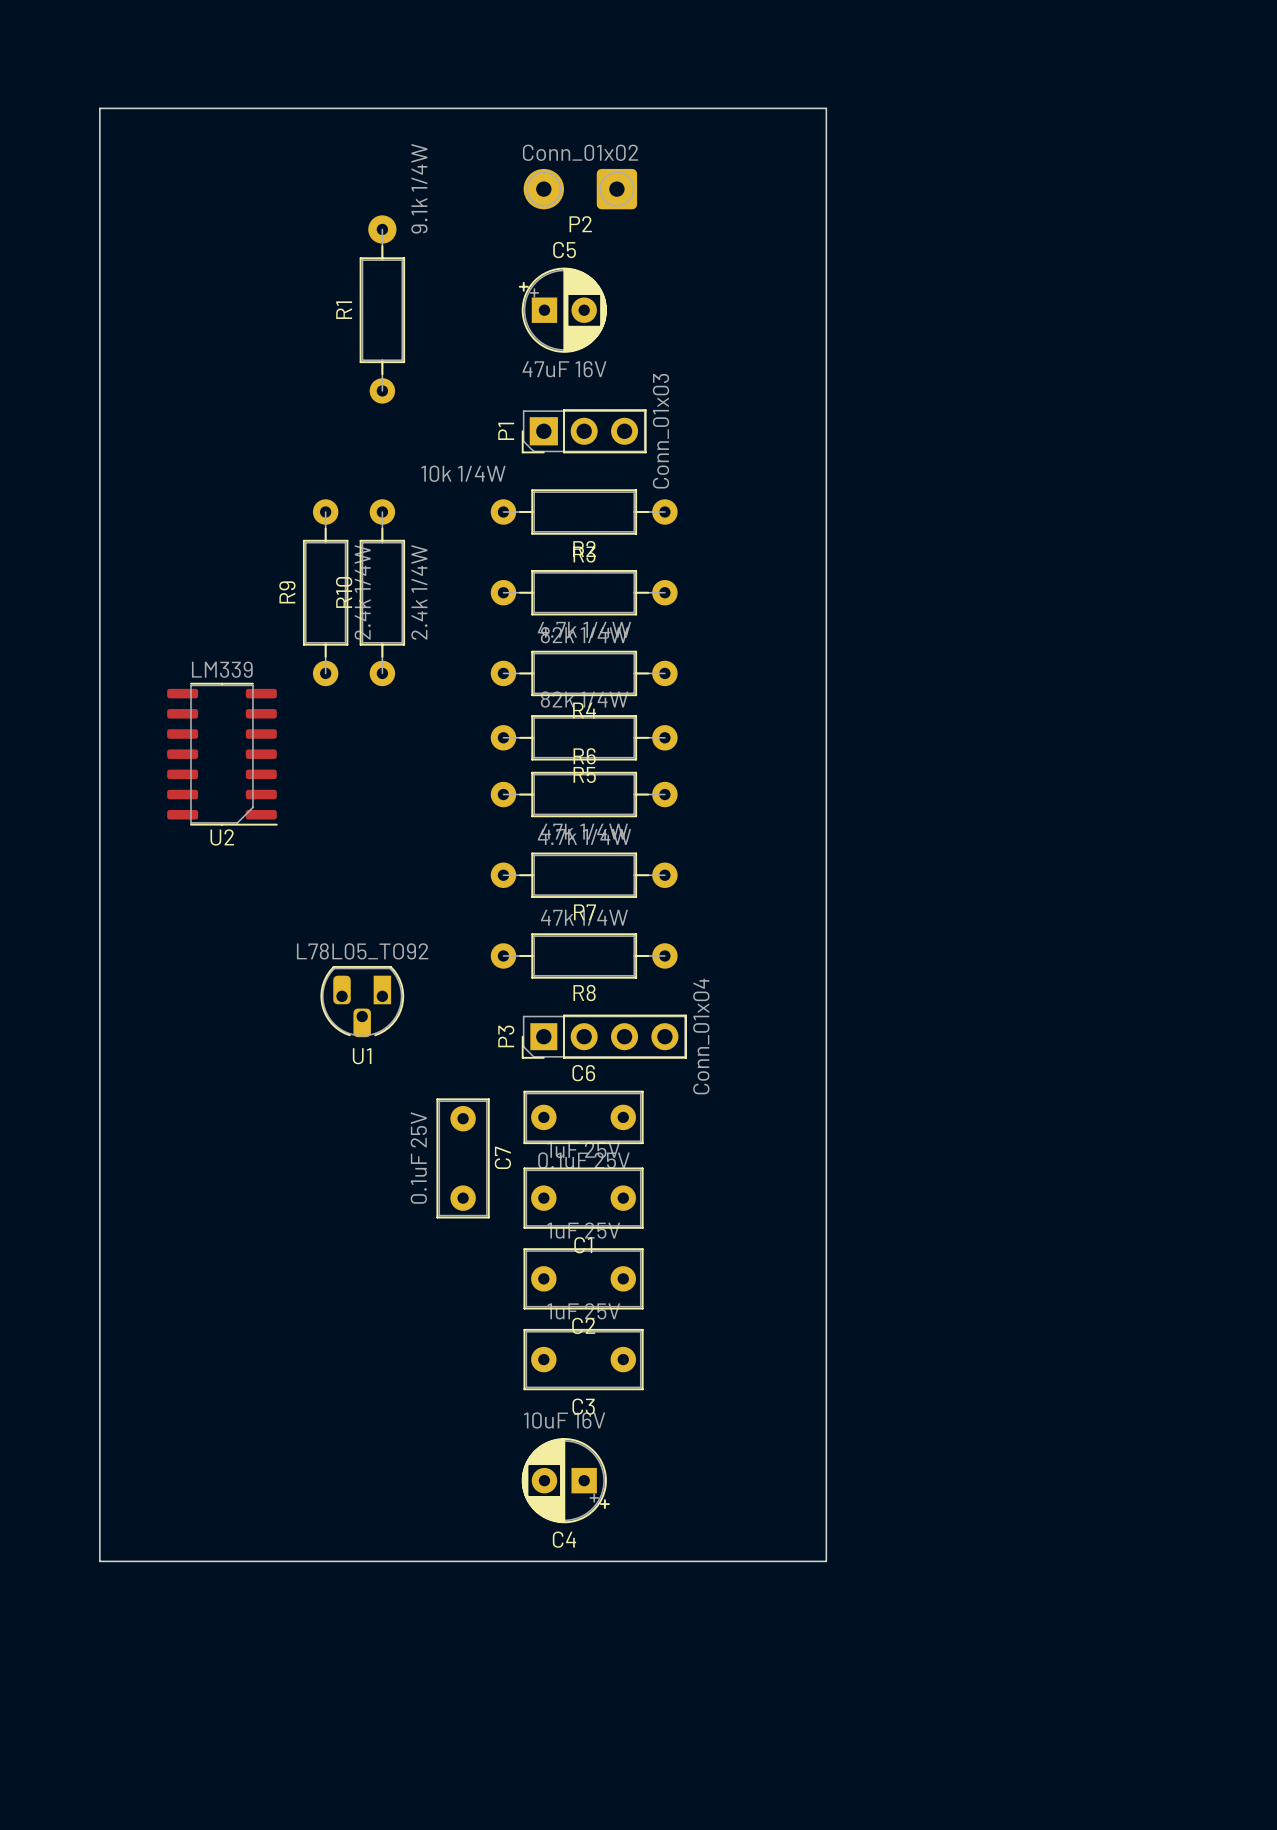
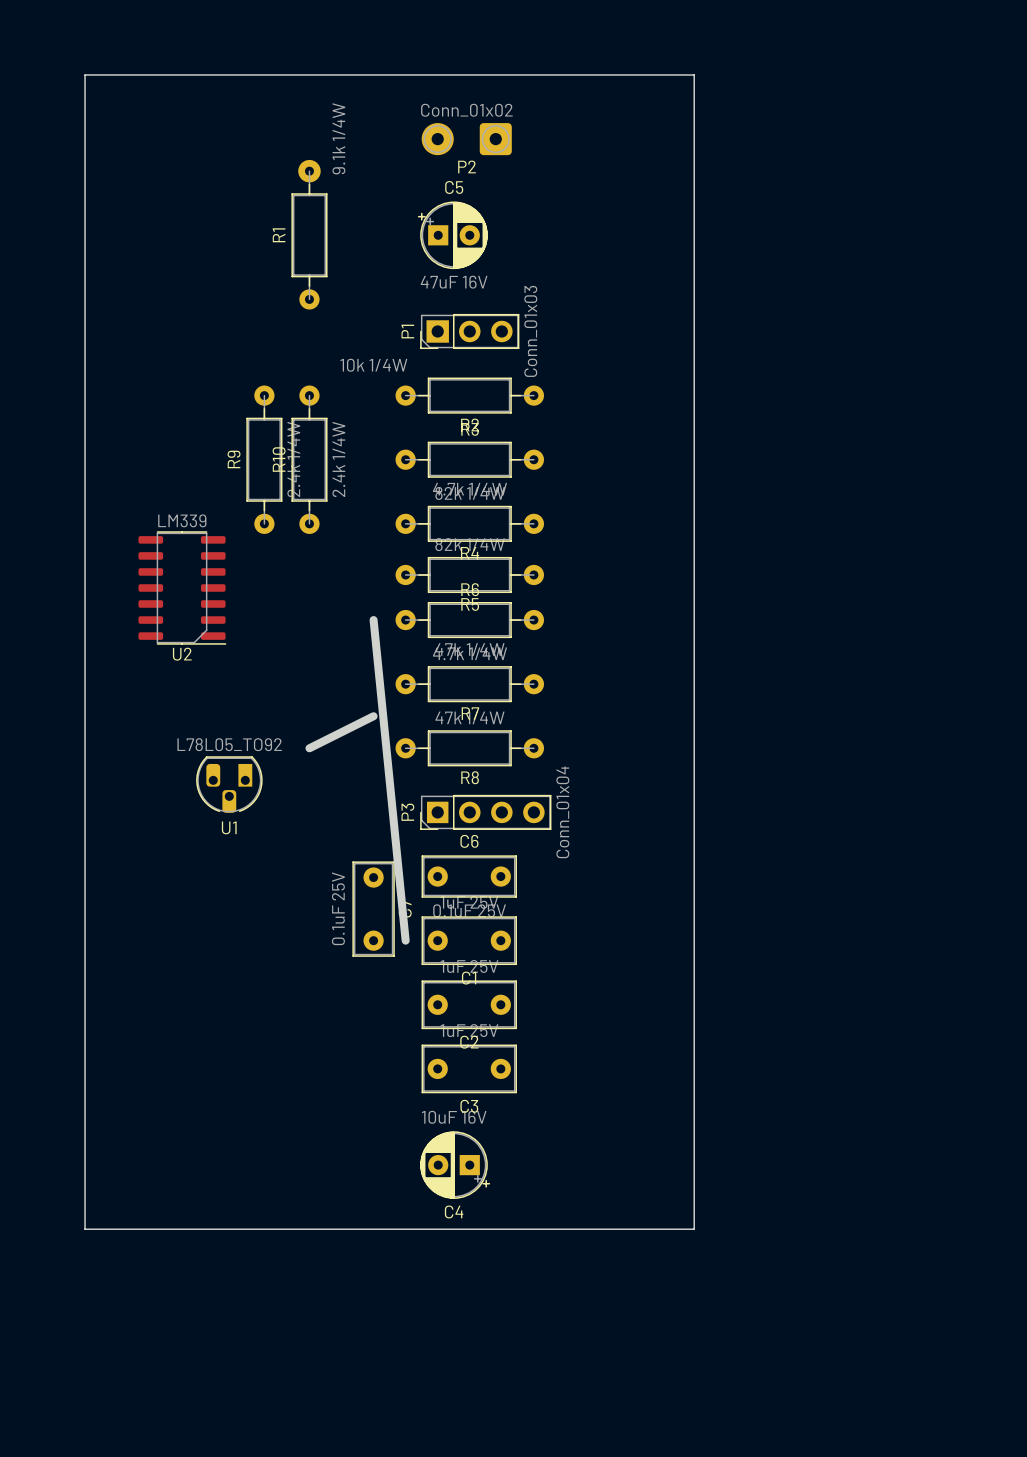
board edge: (826, 108) (826, 1561) -> (662, 74) (694, 74) (694, 1229) (662, 1229)
board edge: none -> (373, 620) (405, 940)
board edge: none -> (373, 716) (309, 748)
U1 position: (362, 1001) -> (229, 784)

